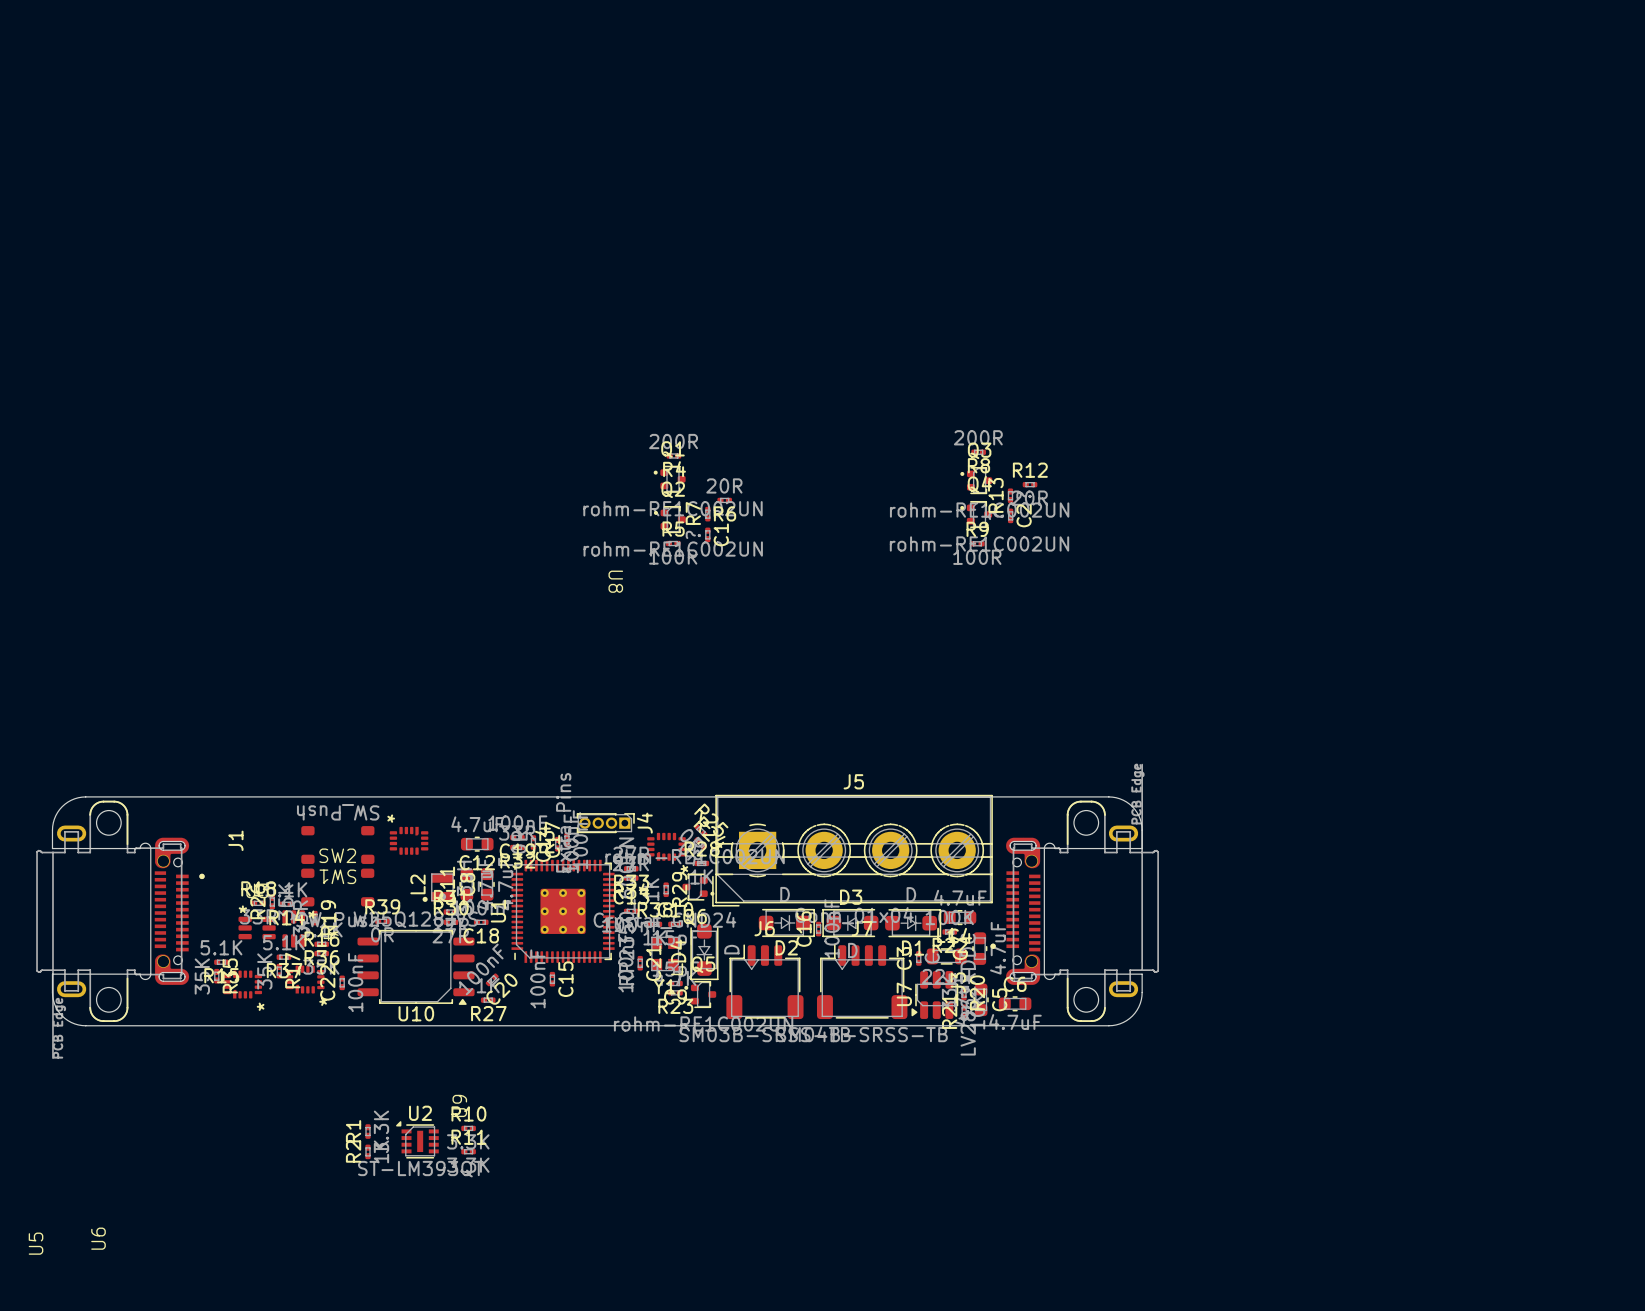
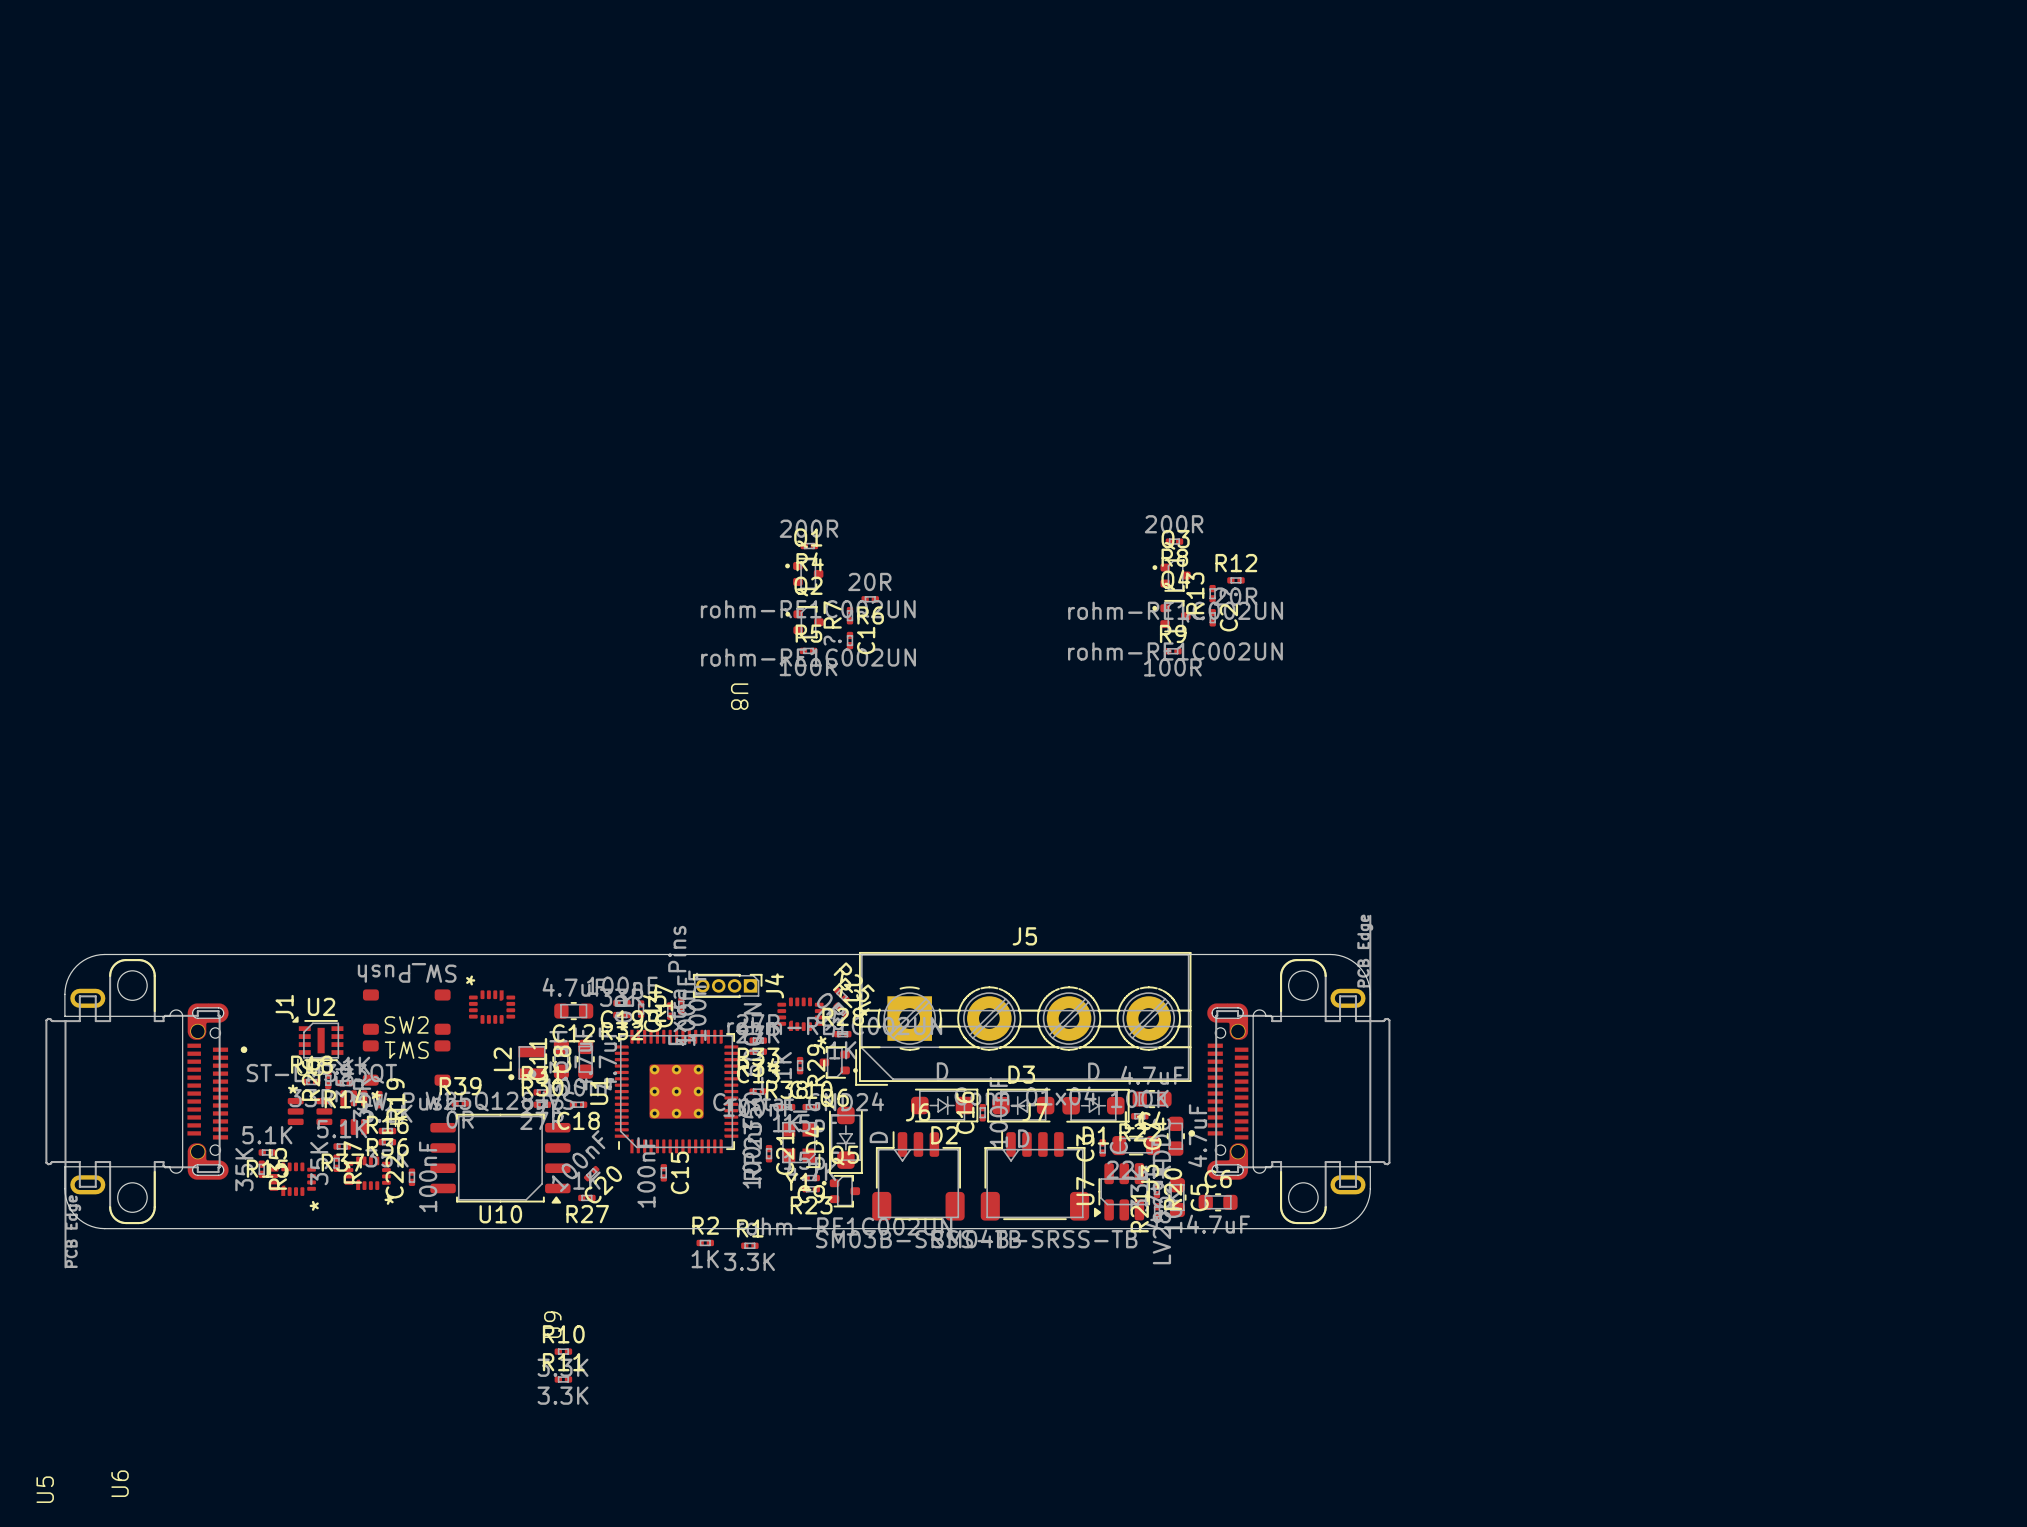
R1 rotation: 0° (368, 1131) -> 90° clockwise (749, 1245)
R1 position: (368, 1131) -> (749, 1245)
U2 position: (417, 1139) -> (317, 1038)
R2 rotation: 0° (368, 1151) -> 90° clockwise (705, 1242)
R2 position: (368, 1151) -> (705, 1242)

